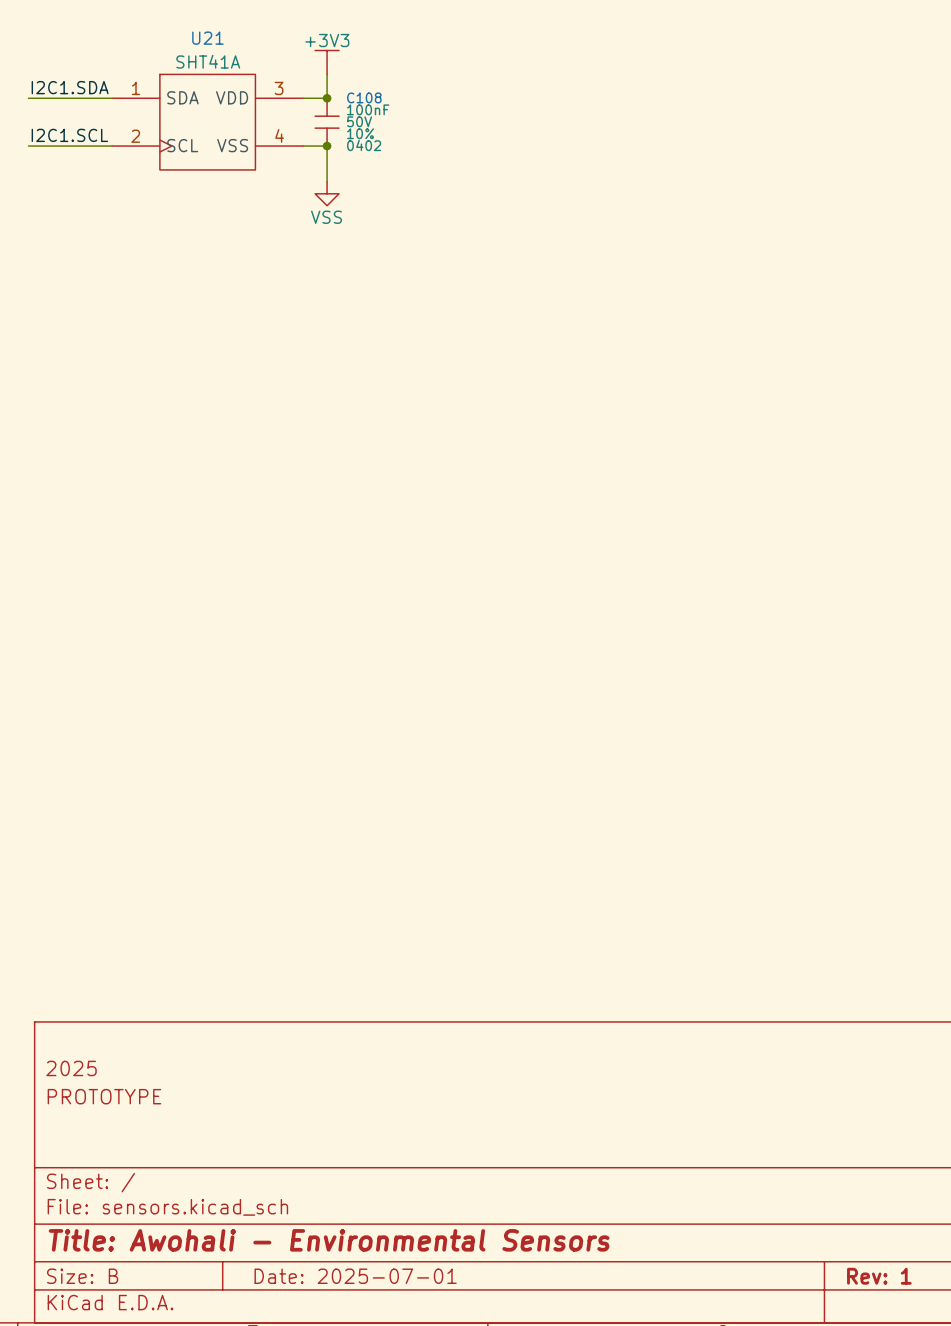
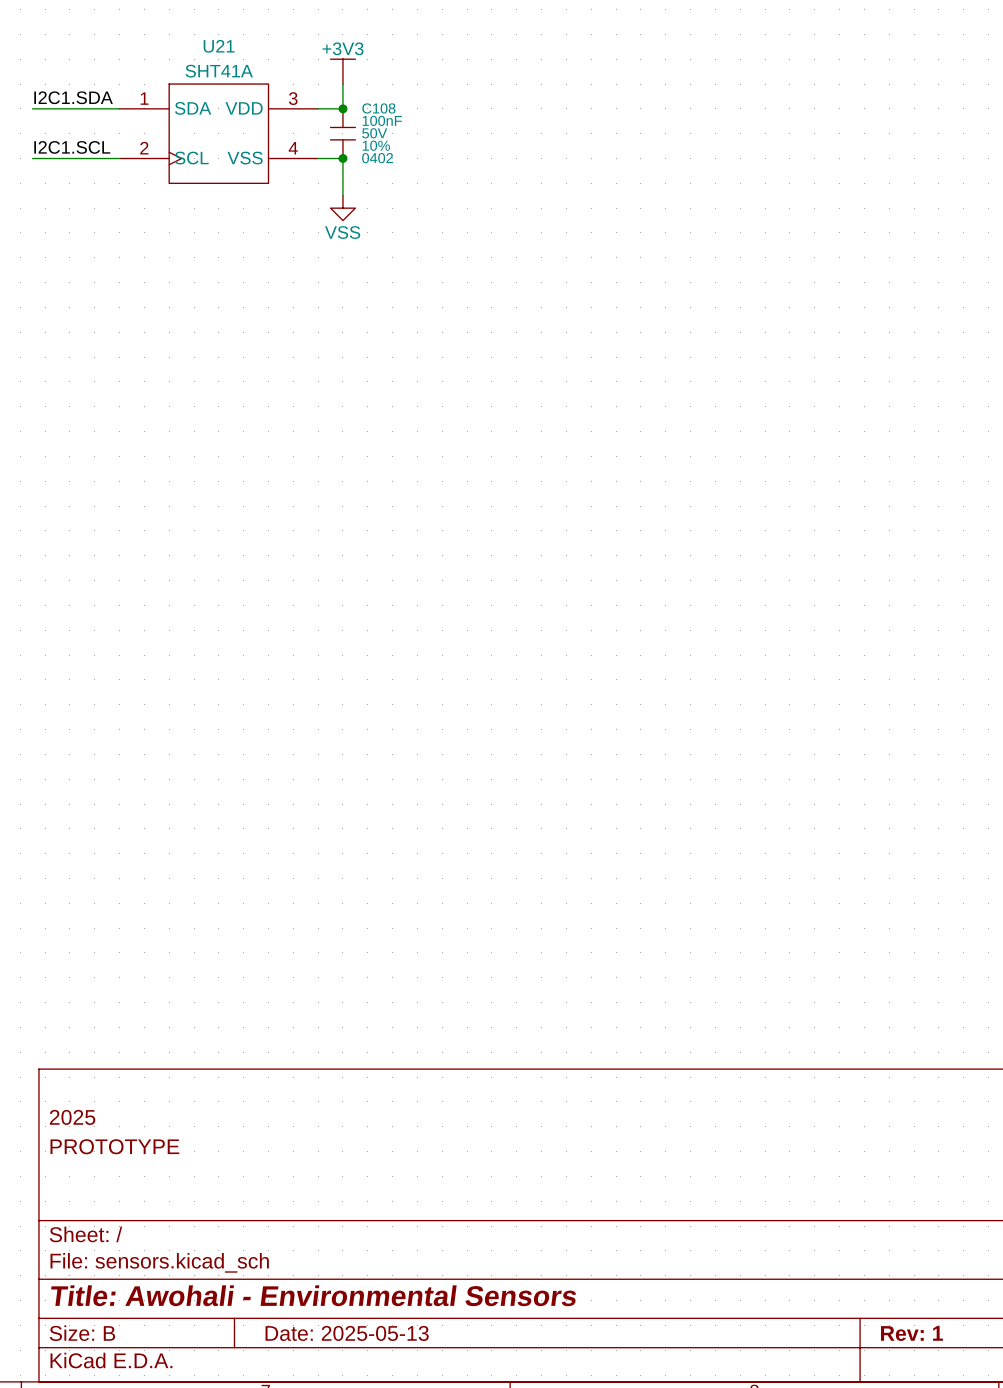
title block: Date: 2025-07-01 (355, 1276) -> Date: 2025-05-13 (347, 1333)

